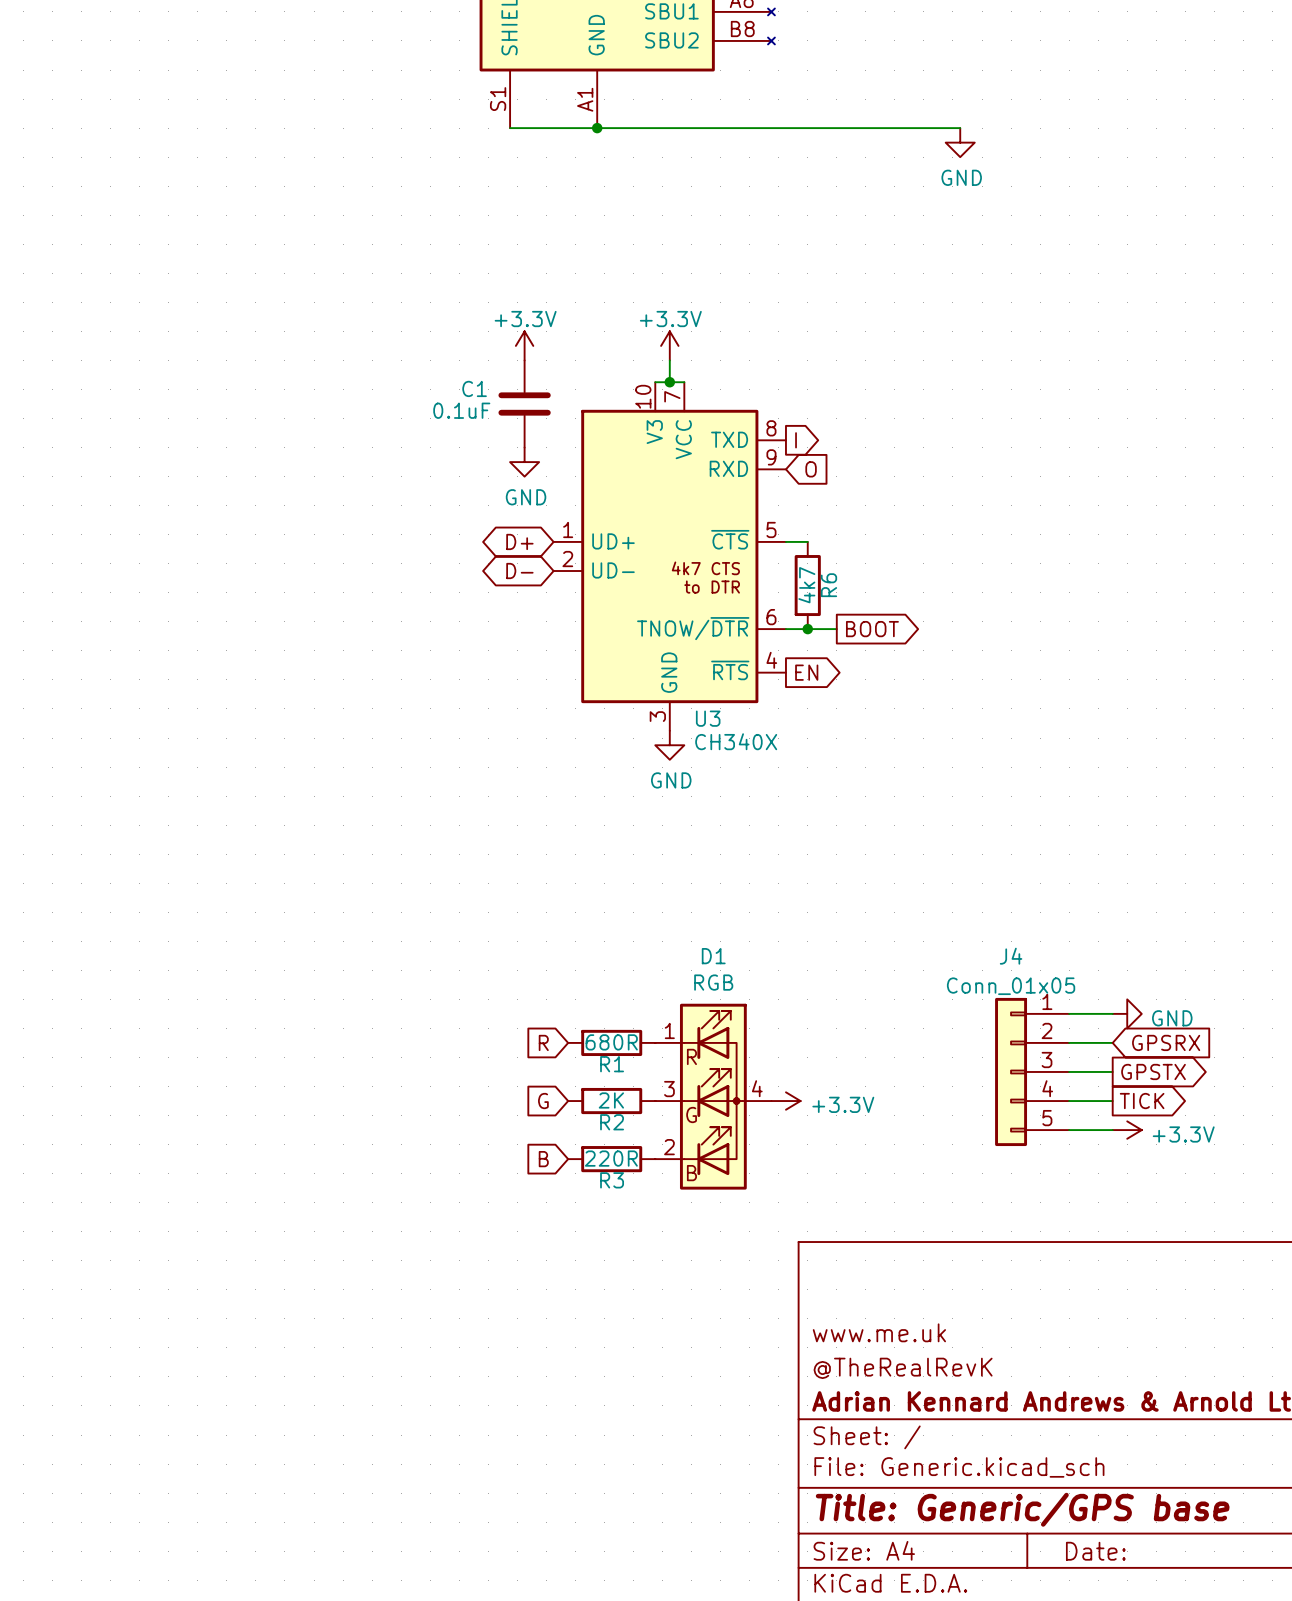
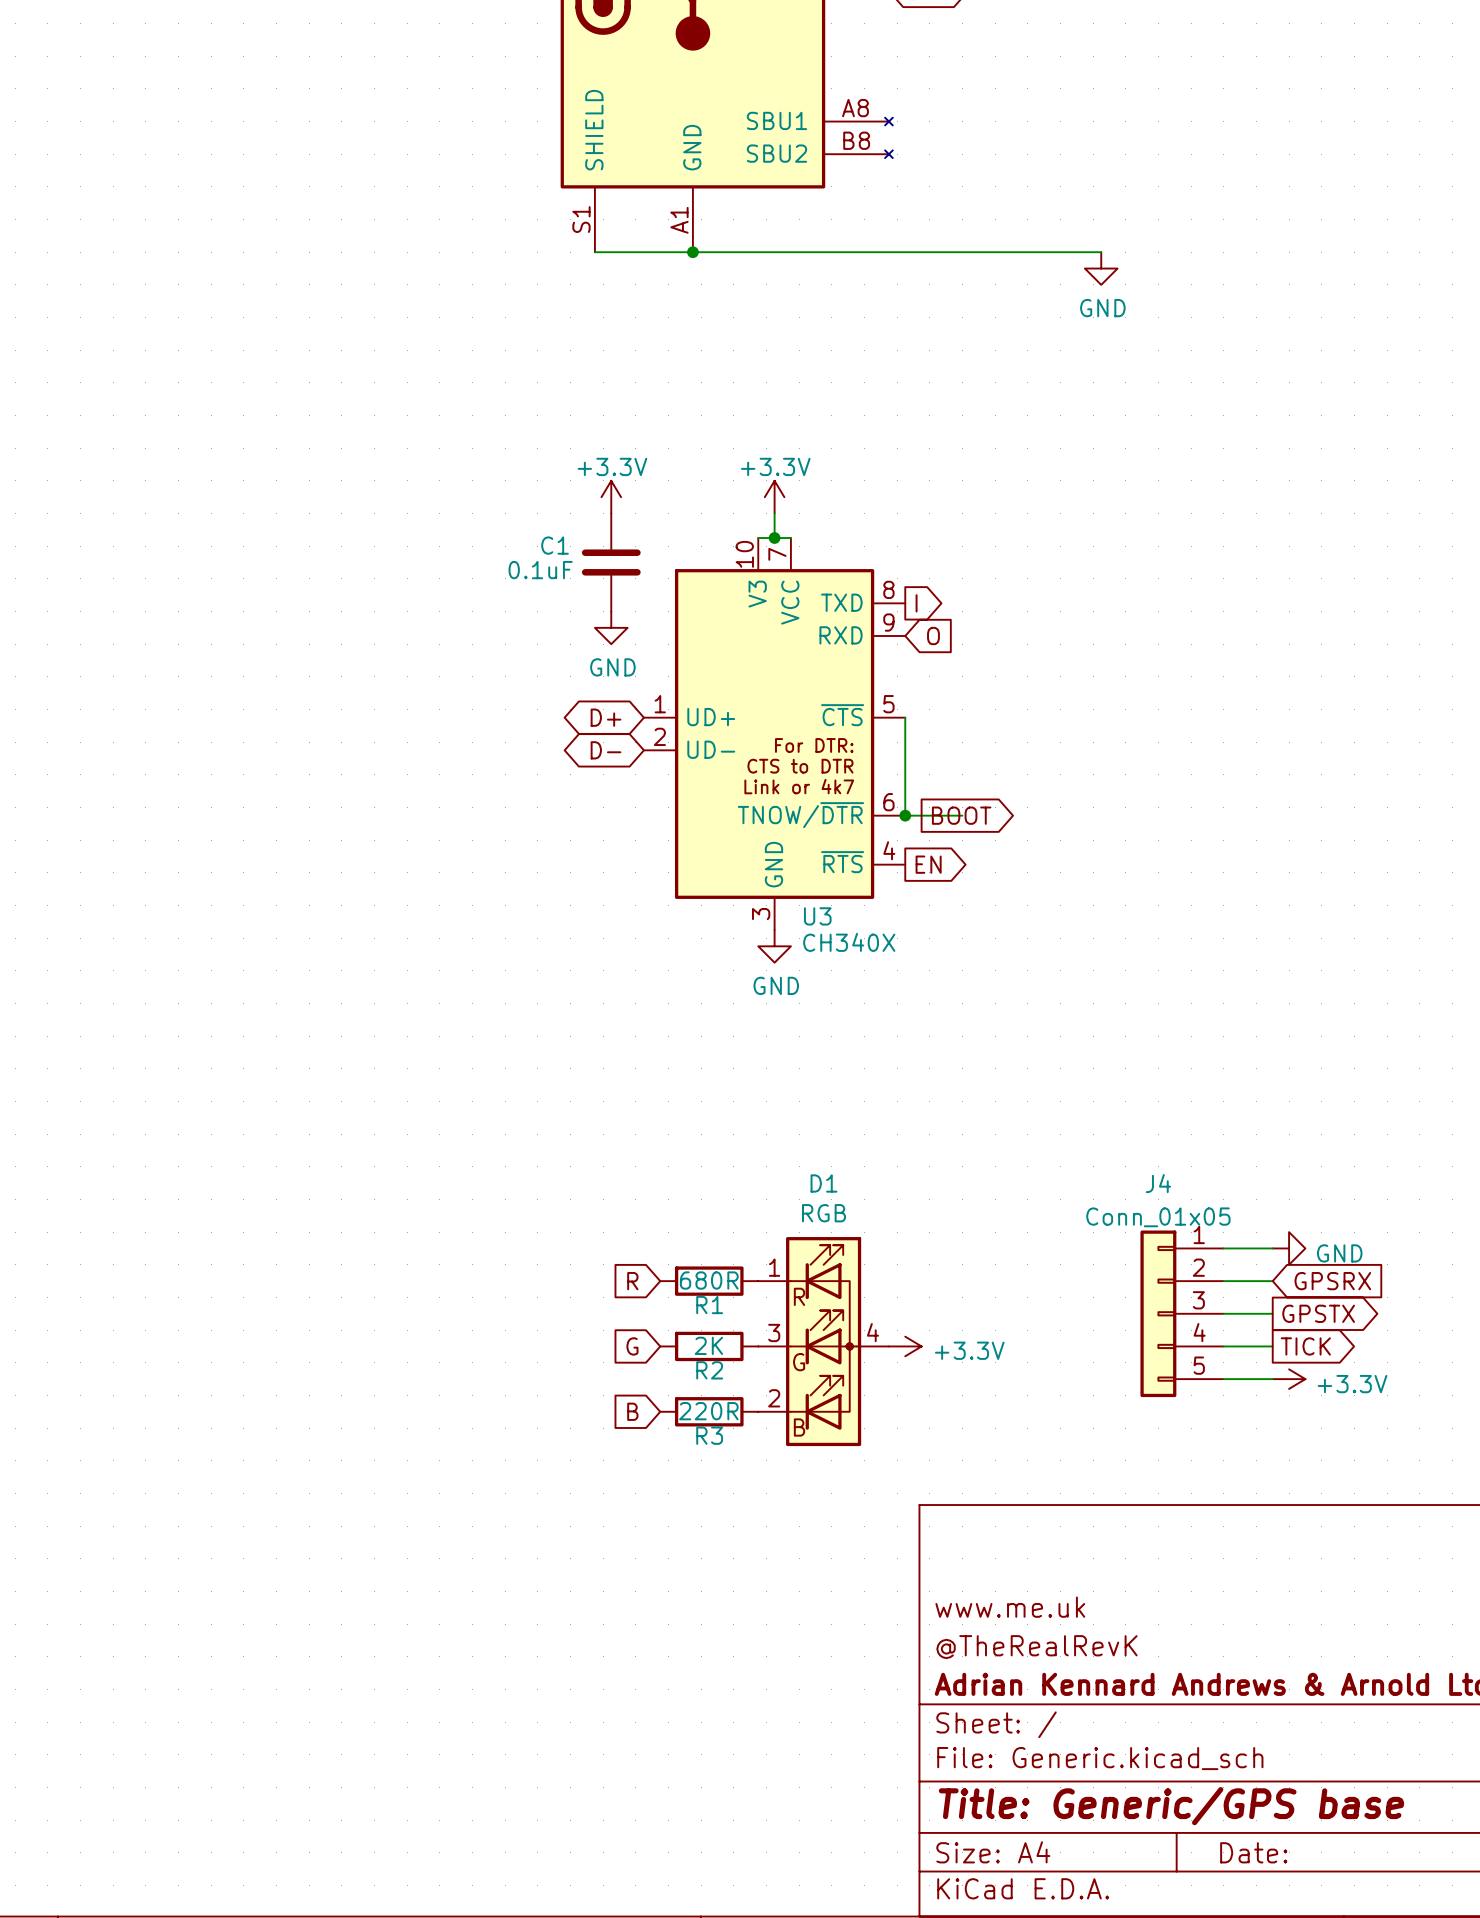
wire: (785, 541) (807, 541) -> (905, 717) (905, 815)
U3 text: none -> For DTR: (814, 745)
U3 text: 4k7 CTS (705, 568) -> none
U3 text: none -> CTS to DTR (800, 766)
R6: 4k7 (807, 585) -> none
U3 text: to DTR (712, 587) -> none
U3 text: none -> Link or 4k7 (799, 786)
junction position: (807, 629) -> (905, 815)
global label position: BOOT (872, 629) -> BOOT (961, 815)

